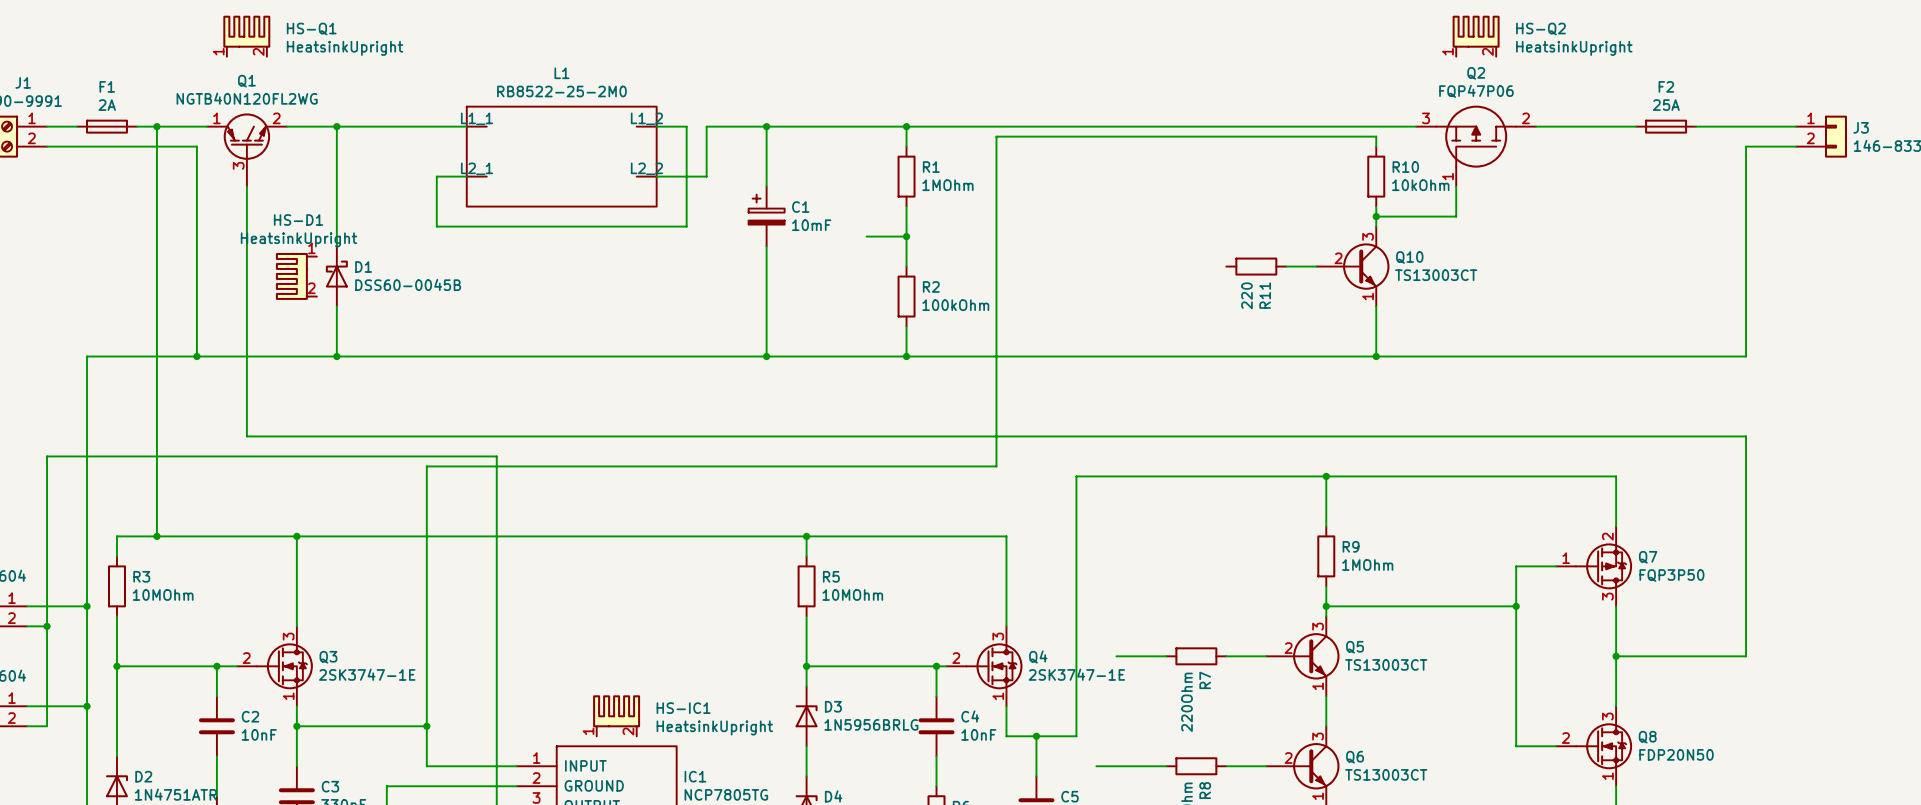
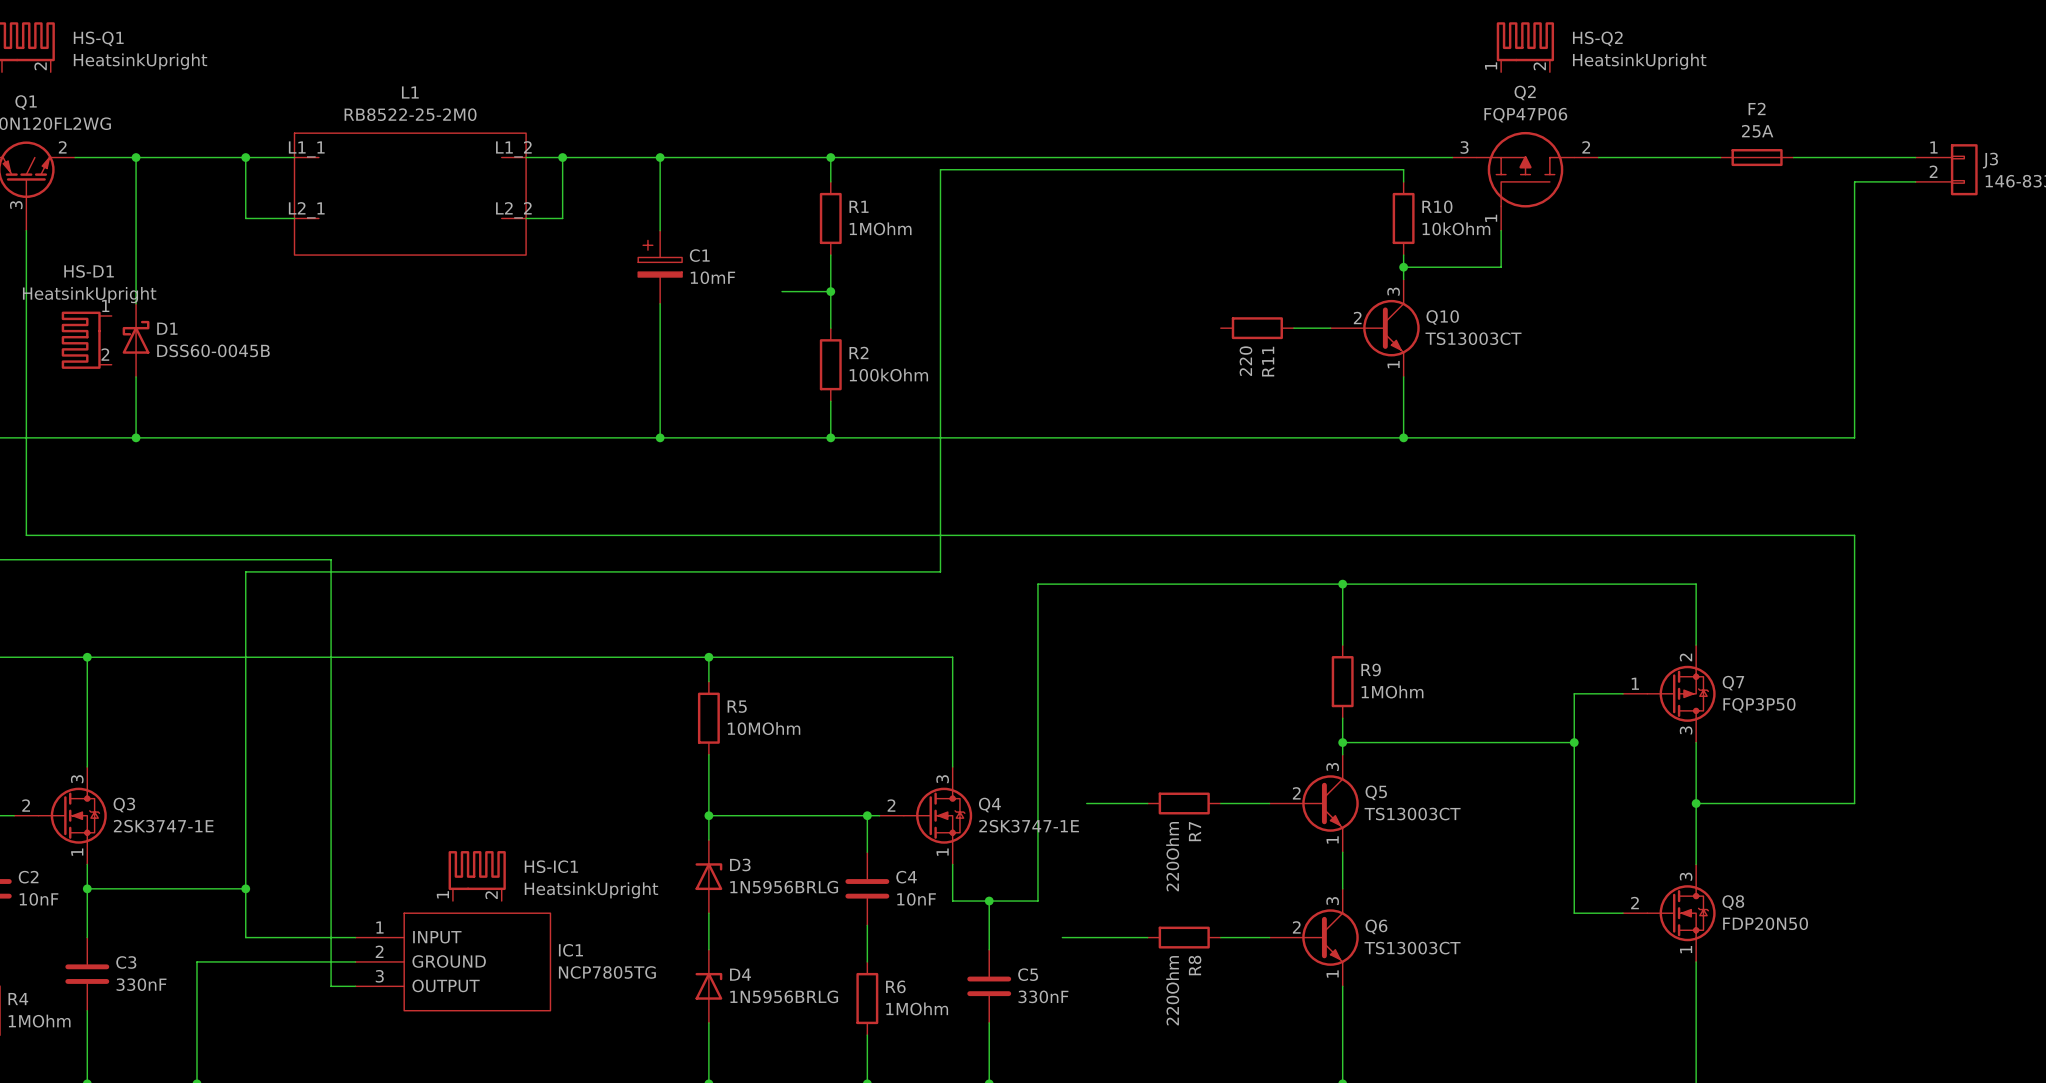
wire: none -> (245, 157) (245, 218) (257, 218)
junction: none -> (245, 157)
junction: none -> (562, 157)
wire: (706, 126) (706, 176) (686, 176) (686, 226) (436, 226) (436, 176) -> (587, 157) (562, 157)

